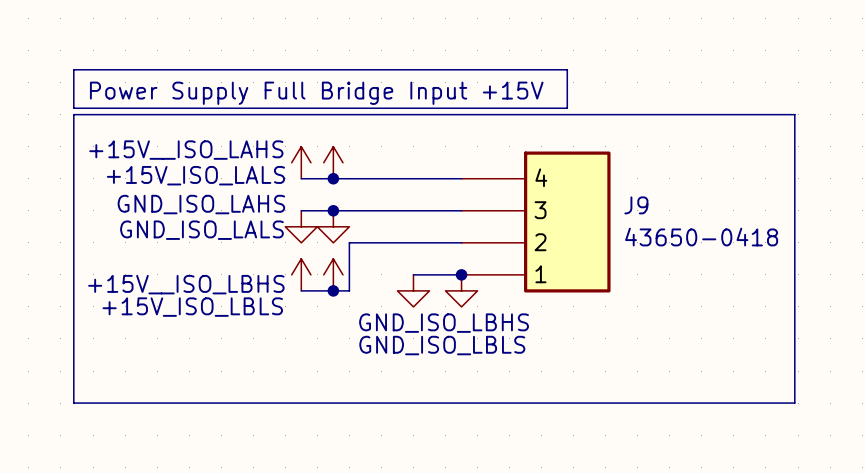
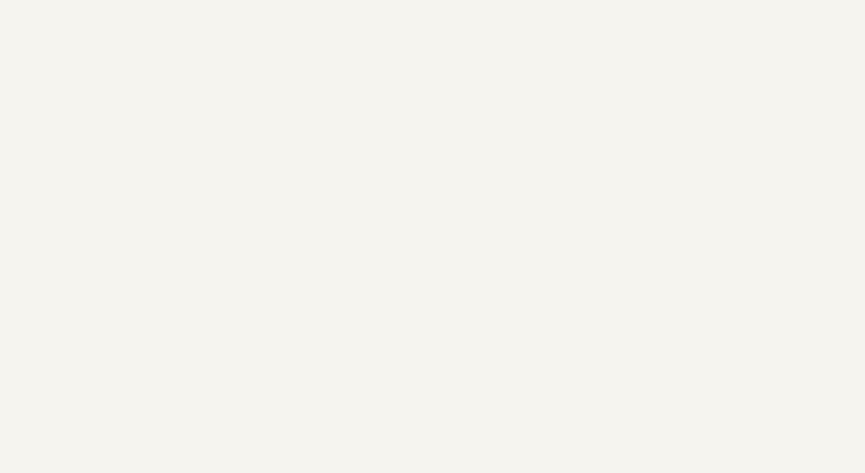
line: (73, 69) (73, 108) (567, 108) (567, 69) (73, 69) -> none
text: Power Supply Full Bridge Input +15V (316, 93) -> none
line: (73, 114) (794, 114) (794, 403) (73, 403) (73, 114) -> none
power symbol: +15V__ISO_LAHS (301, 162) -> none
power symbol: +15V_ISO_LALS (333, 162) -> none
wire: (301, 178) (461, 178) -> none
junction: (333, 178) -> none
wire: (301, 210) (461, 210) -> none
junction: (333, 210) -> none
J9: 43650-0418 (536, 222) -> none
power symbol: GND_ISO_LAHS (301, 226) -> none
power symbol: GND_ISO_LALS (333, 226) -> none
wire: (461, 242) (349, 242) (349, 290) (301, 290) -> none
power symbol: +15V__ISO_LBHS (301, 274) -> none
power symbol: +15V_ISO_LBLS (333, 274) -> none
wire: (413, 274) (461, 274) -> none
junction: (461, 274) -> none
junction: (333, 290) -> none
power symbol: GND_ISO_LBLS (413, 290) -> none
power symbol: GND_ISO_LBHS (461, 290) -> none

